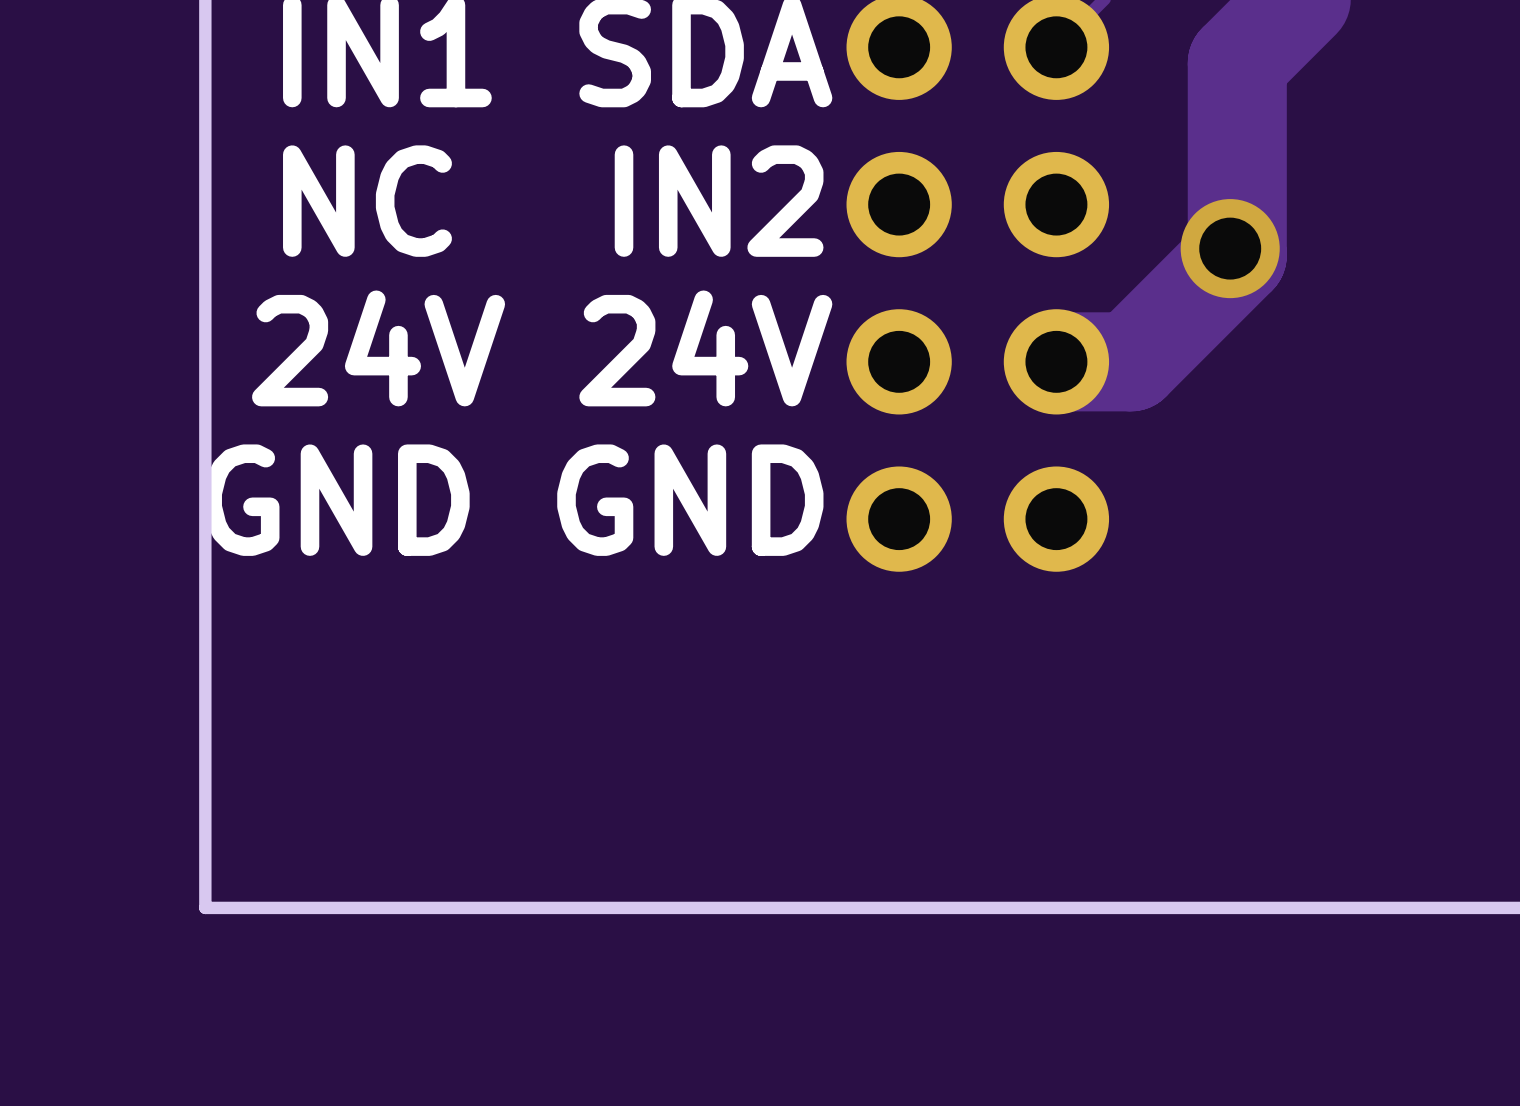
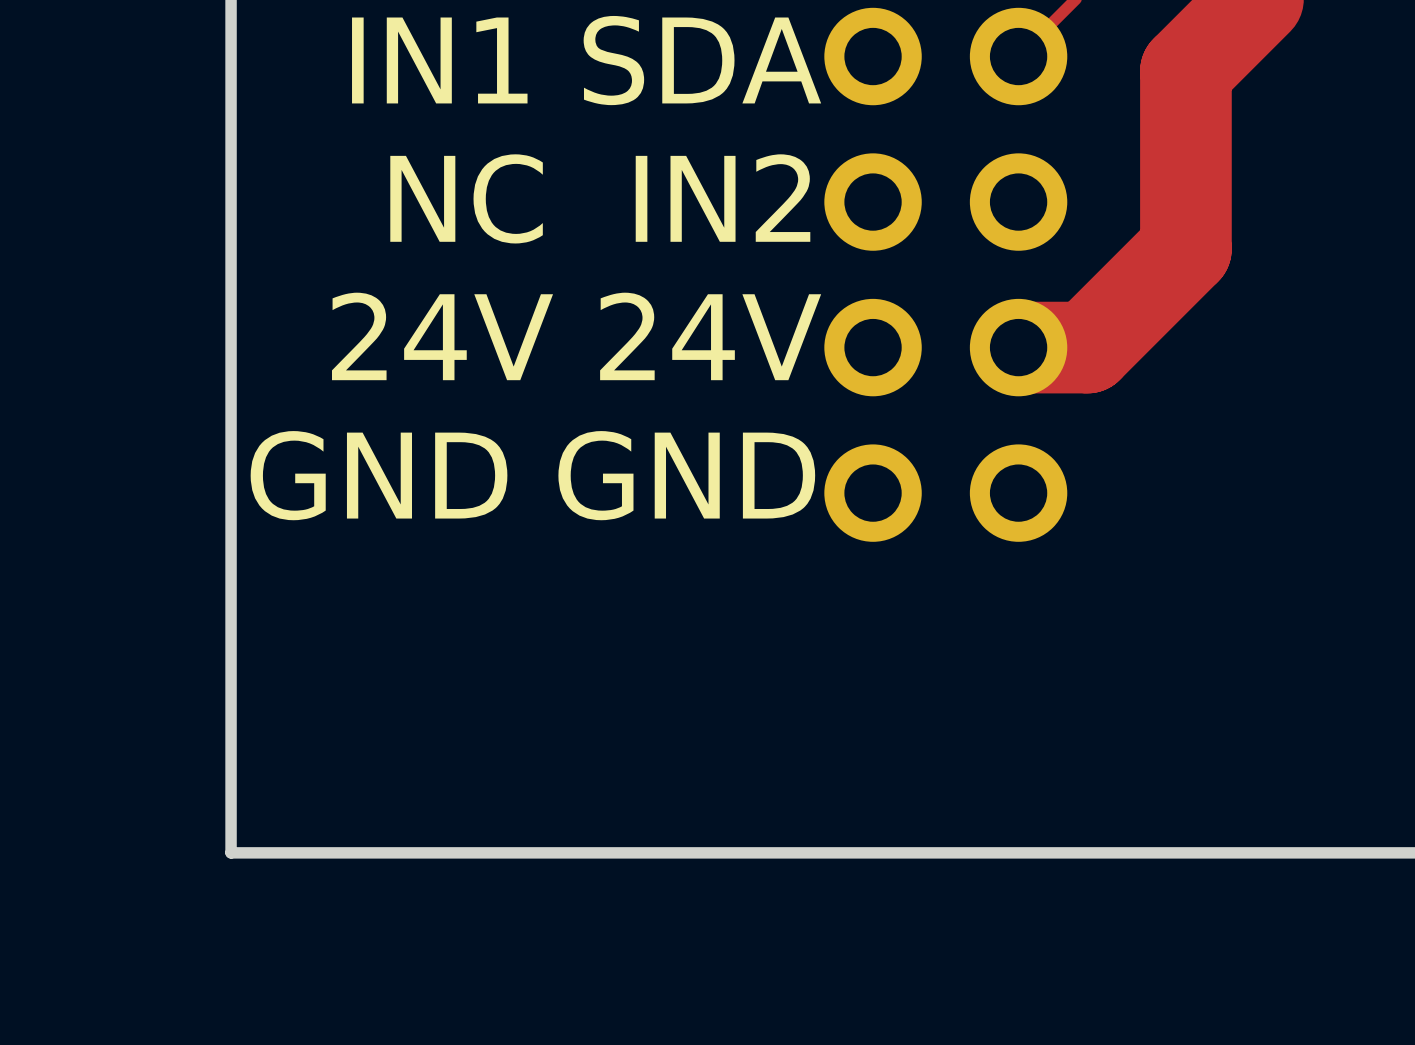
via: (1230, 248) -> none

